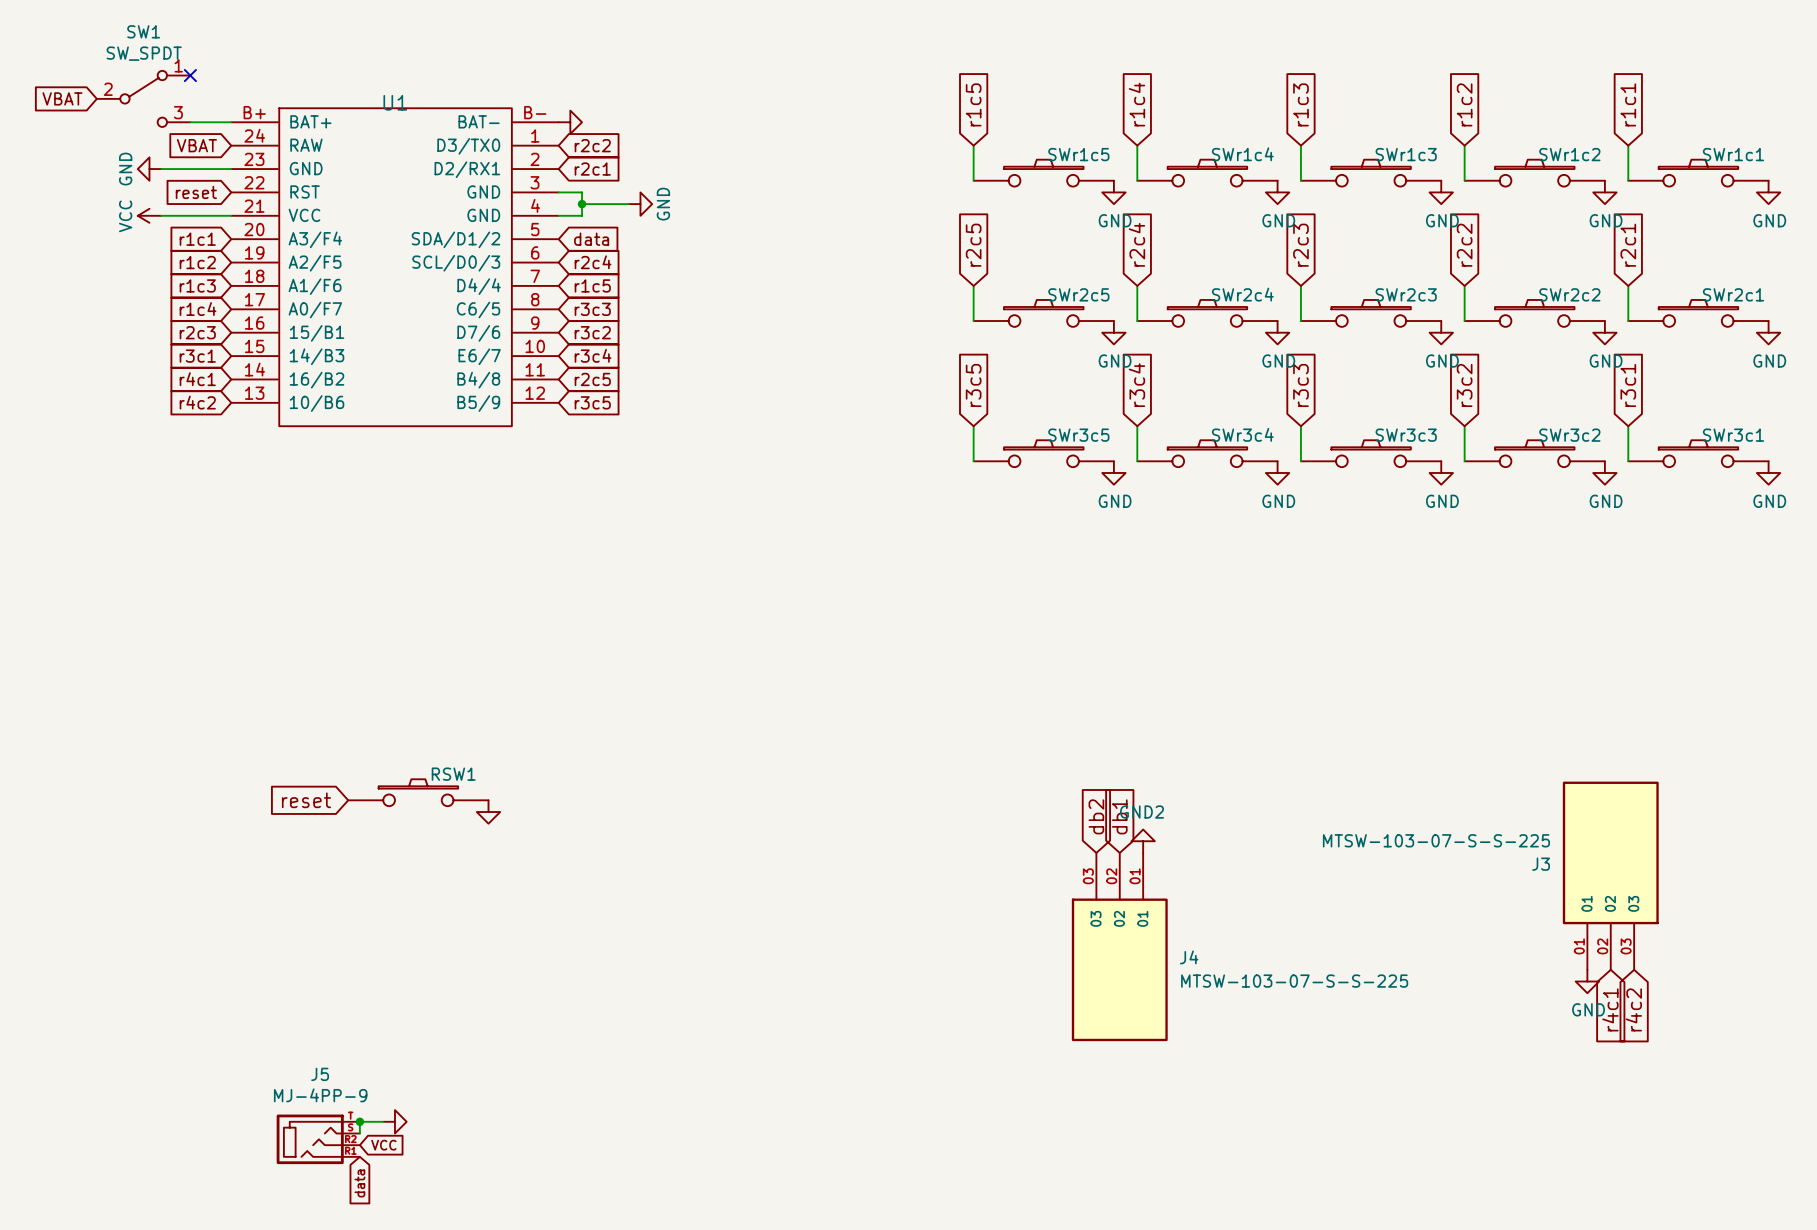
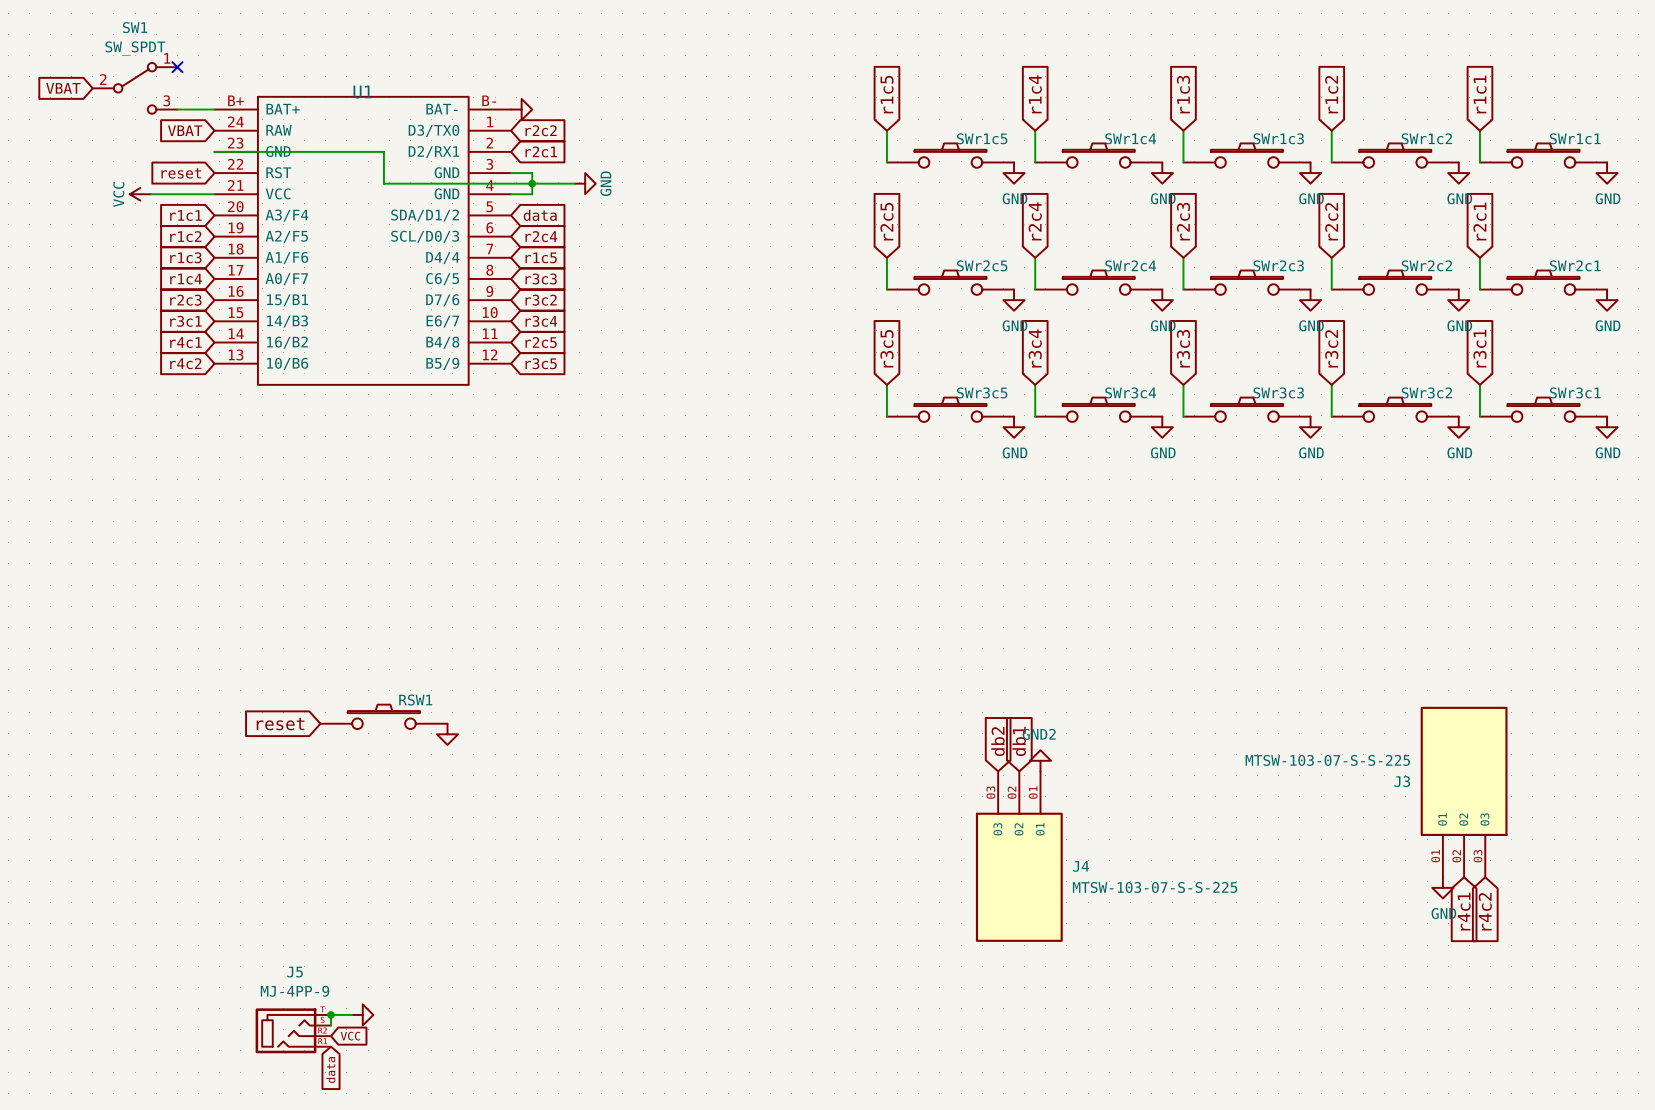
power symbol: GND (149, 169) -> none
wire: (161, 169) (231, 169) -> (532, 183) (383, 183) (383, 151) (214, 151)

